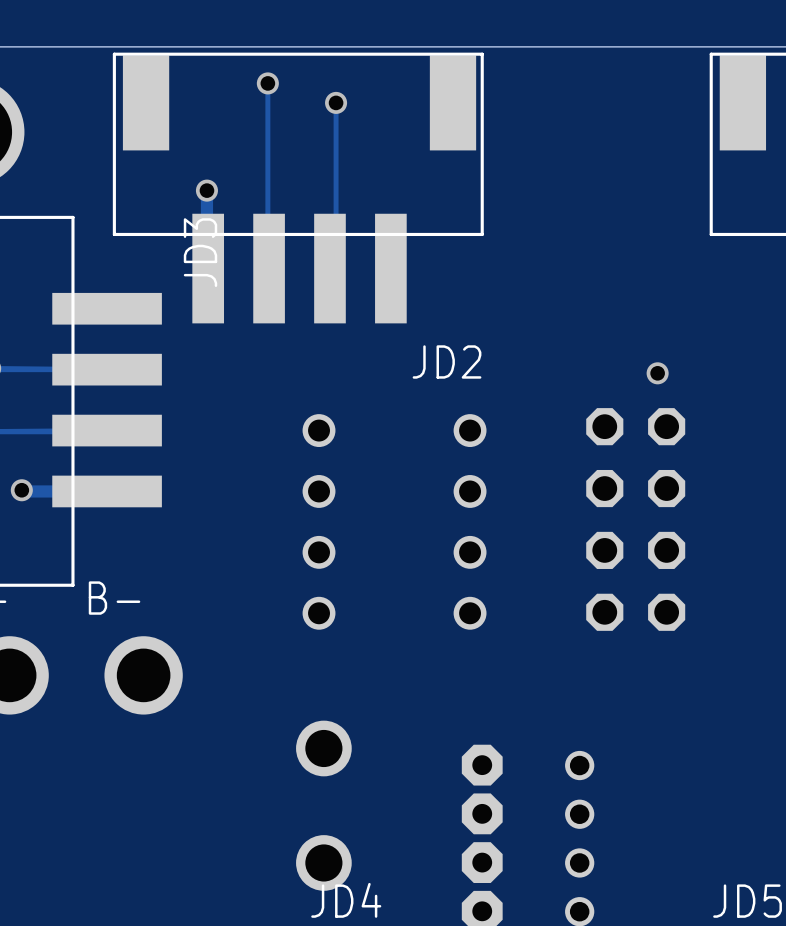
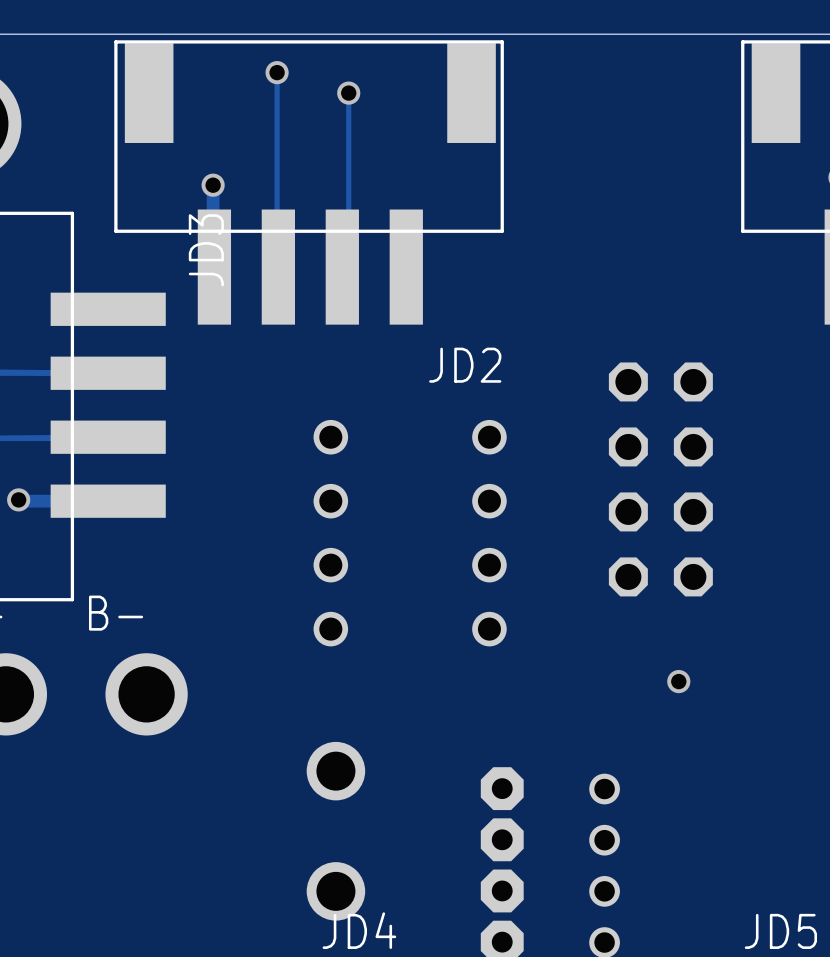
via: (657, 373) -> none
part position: (635, 519) -> (660, 479)
via: none -> (678, 681)

